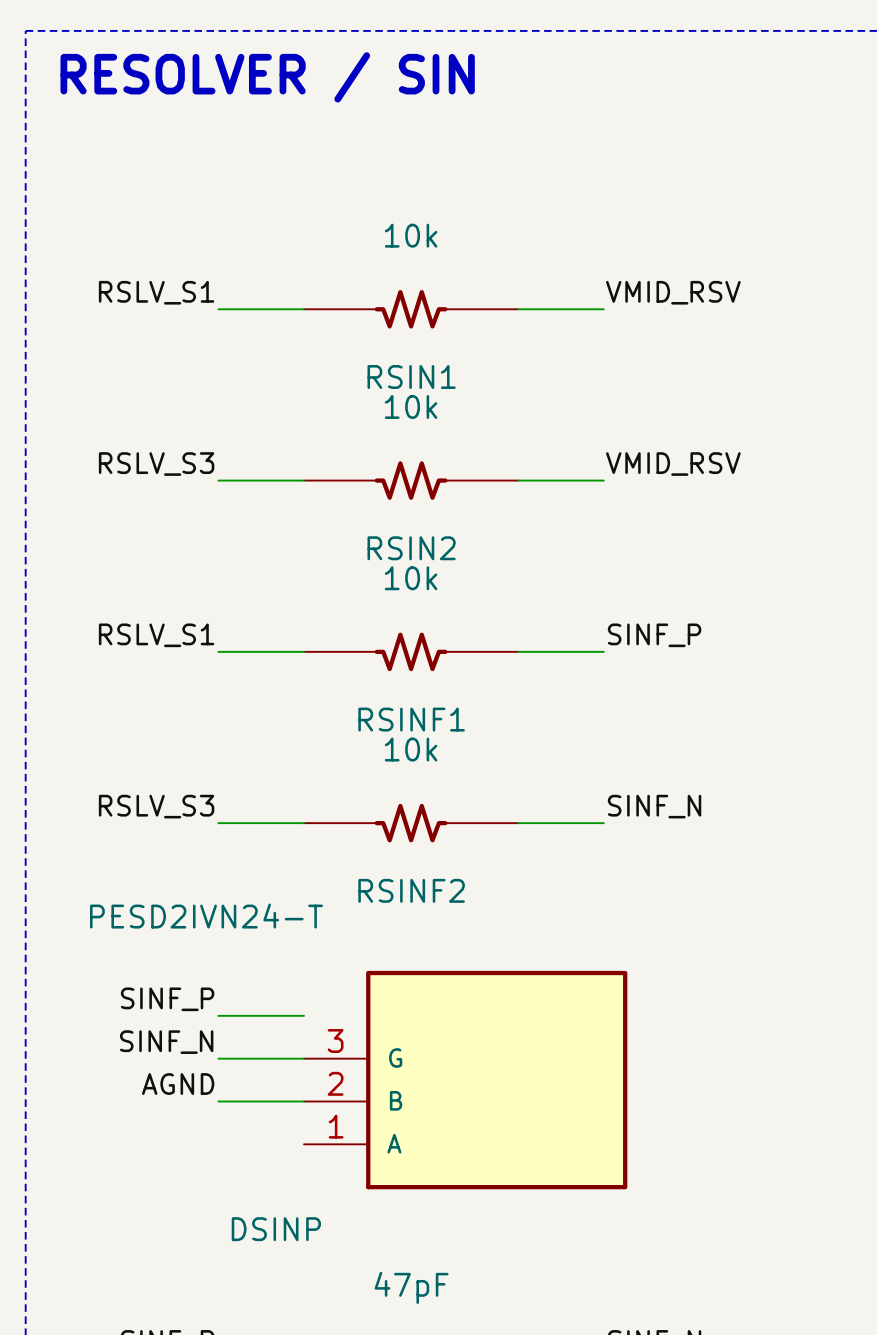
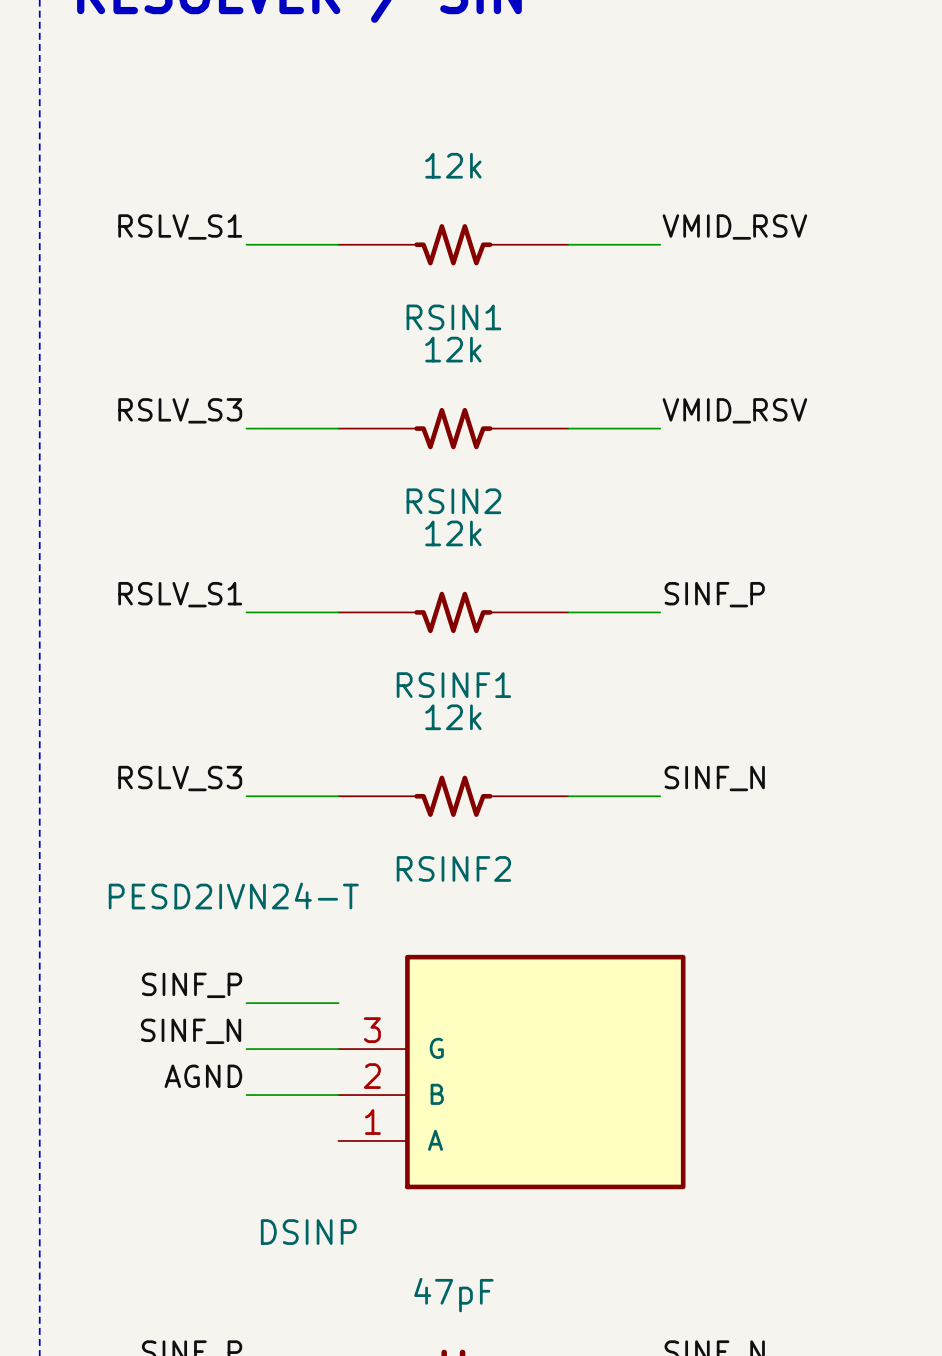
RSIN1 value: 10k (411, 235) -> 12k (453, 165)
RSIN2 value: 10k (411, 406) -> 12k (453, 349)
RSINF1 value: 10k (411, 578) -> 12k (453, 533)
RSINF2 value: 10k (411, 749) -> 12k (453, 717)

